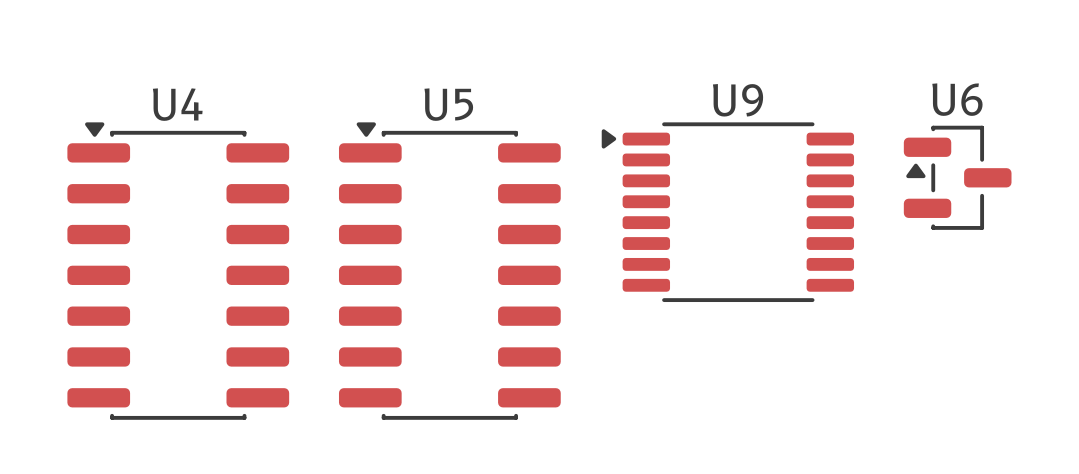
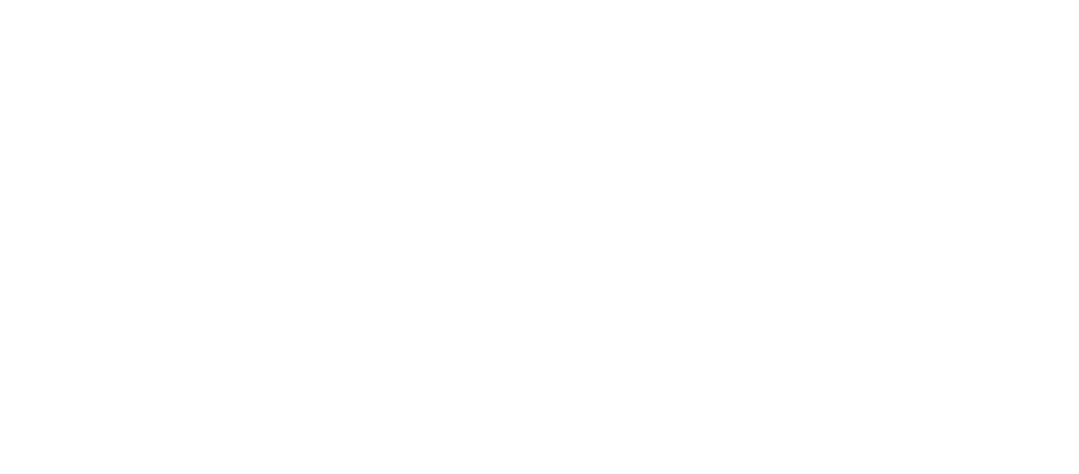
U6: (957, 177) -> none
U9: (727, 212) -> none
U4: (178, 271) -> none
U5: (449, 271) -> none

